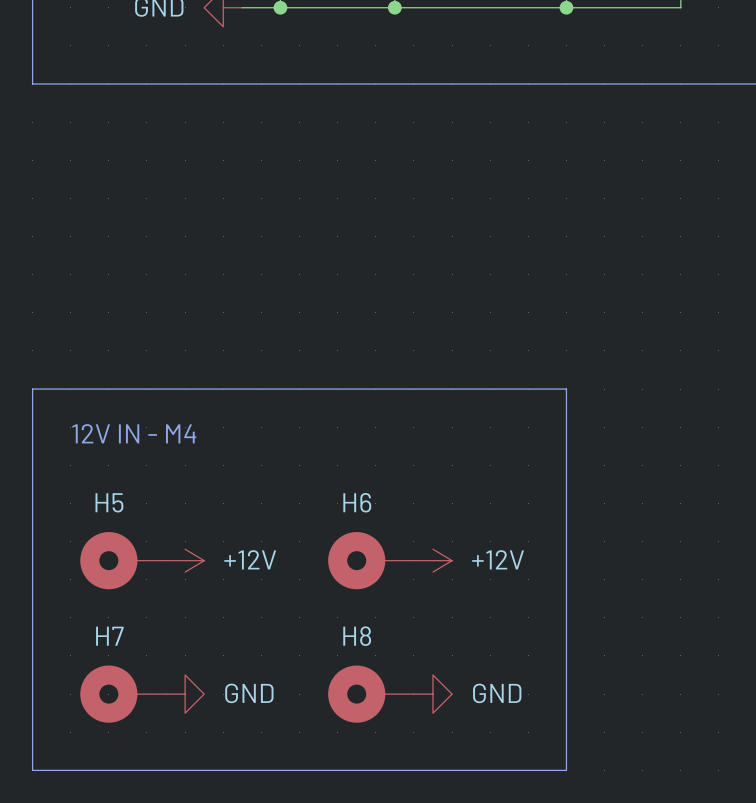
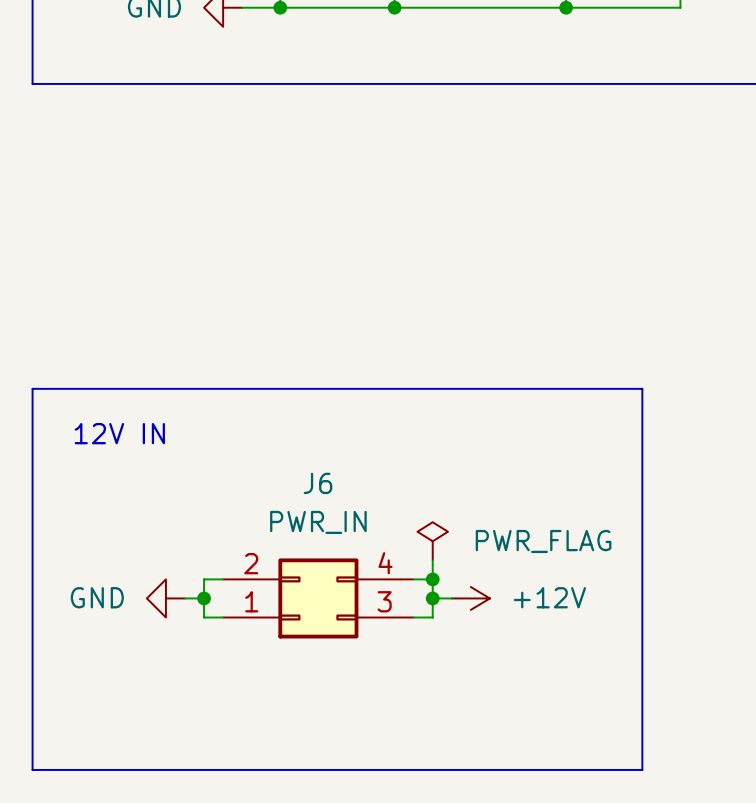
line: (566, 389) (566, 770) -> (566, 388) (642, 388) (642, 769) (566, 769)
text: 12V IN - M4 (134, 433) -> 12V IN (119, 433)
power symbol: none -> PWR_FLAG (432, 541)
H5: (123, 560) -> none
power symbol: +12V (185, 560) -> none
H6: (371, 560) -> none
wire: none -> (432, 560) (432, 617) (413, 617)
power symbol position: +12V (432, 560) -> +12V (470, 598)
wire: none -> (223, 579) (204, 579) (204, 617) (223, 617)
wire: none -> (413, 579) (432, 579)
junction: none -> (432, 579)
wire: none -> (185, 598) (204, 598)
junction: none -> (204, 598)
J6: none -> PWR_IN (318, 598)
wire: none -> (432, 598) (451, 598)
junction: none -> (432, 598)
H7: (123, 694) -> none
power symbol rotation: 0° (185, 694) -> 180° (165, 598)
power symbol position: GND (185, 694) -> GND (165, 598)
H8: (371, 694) -> none
power symbol: GND (432, 694) -> none

